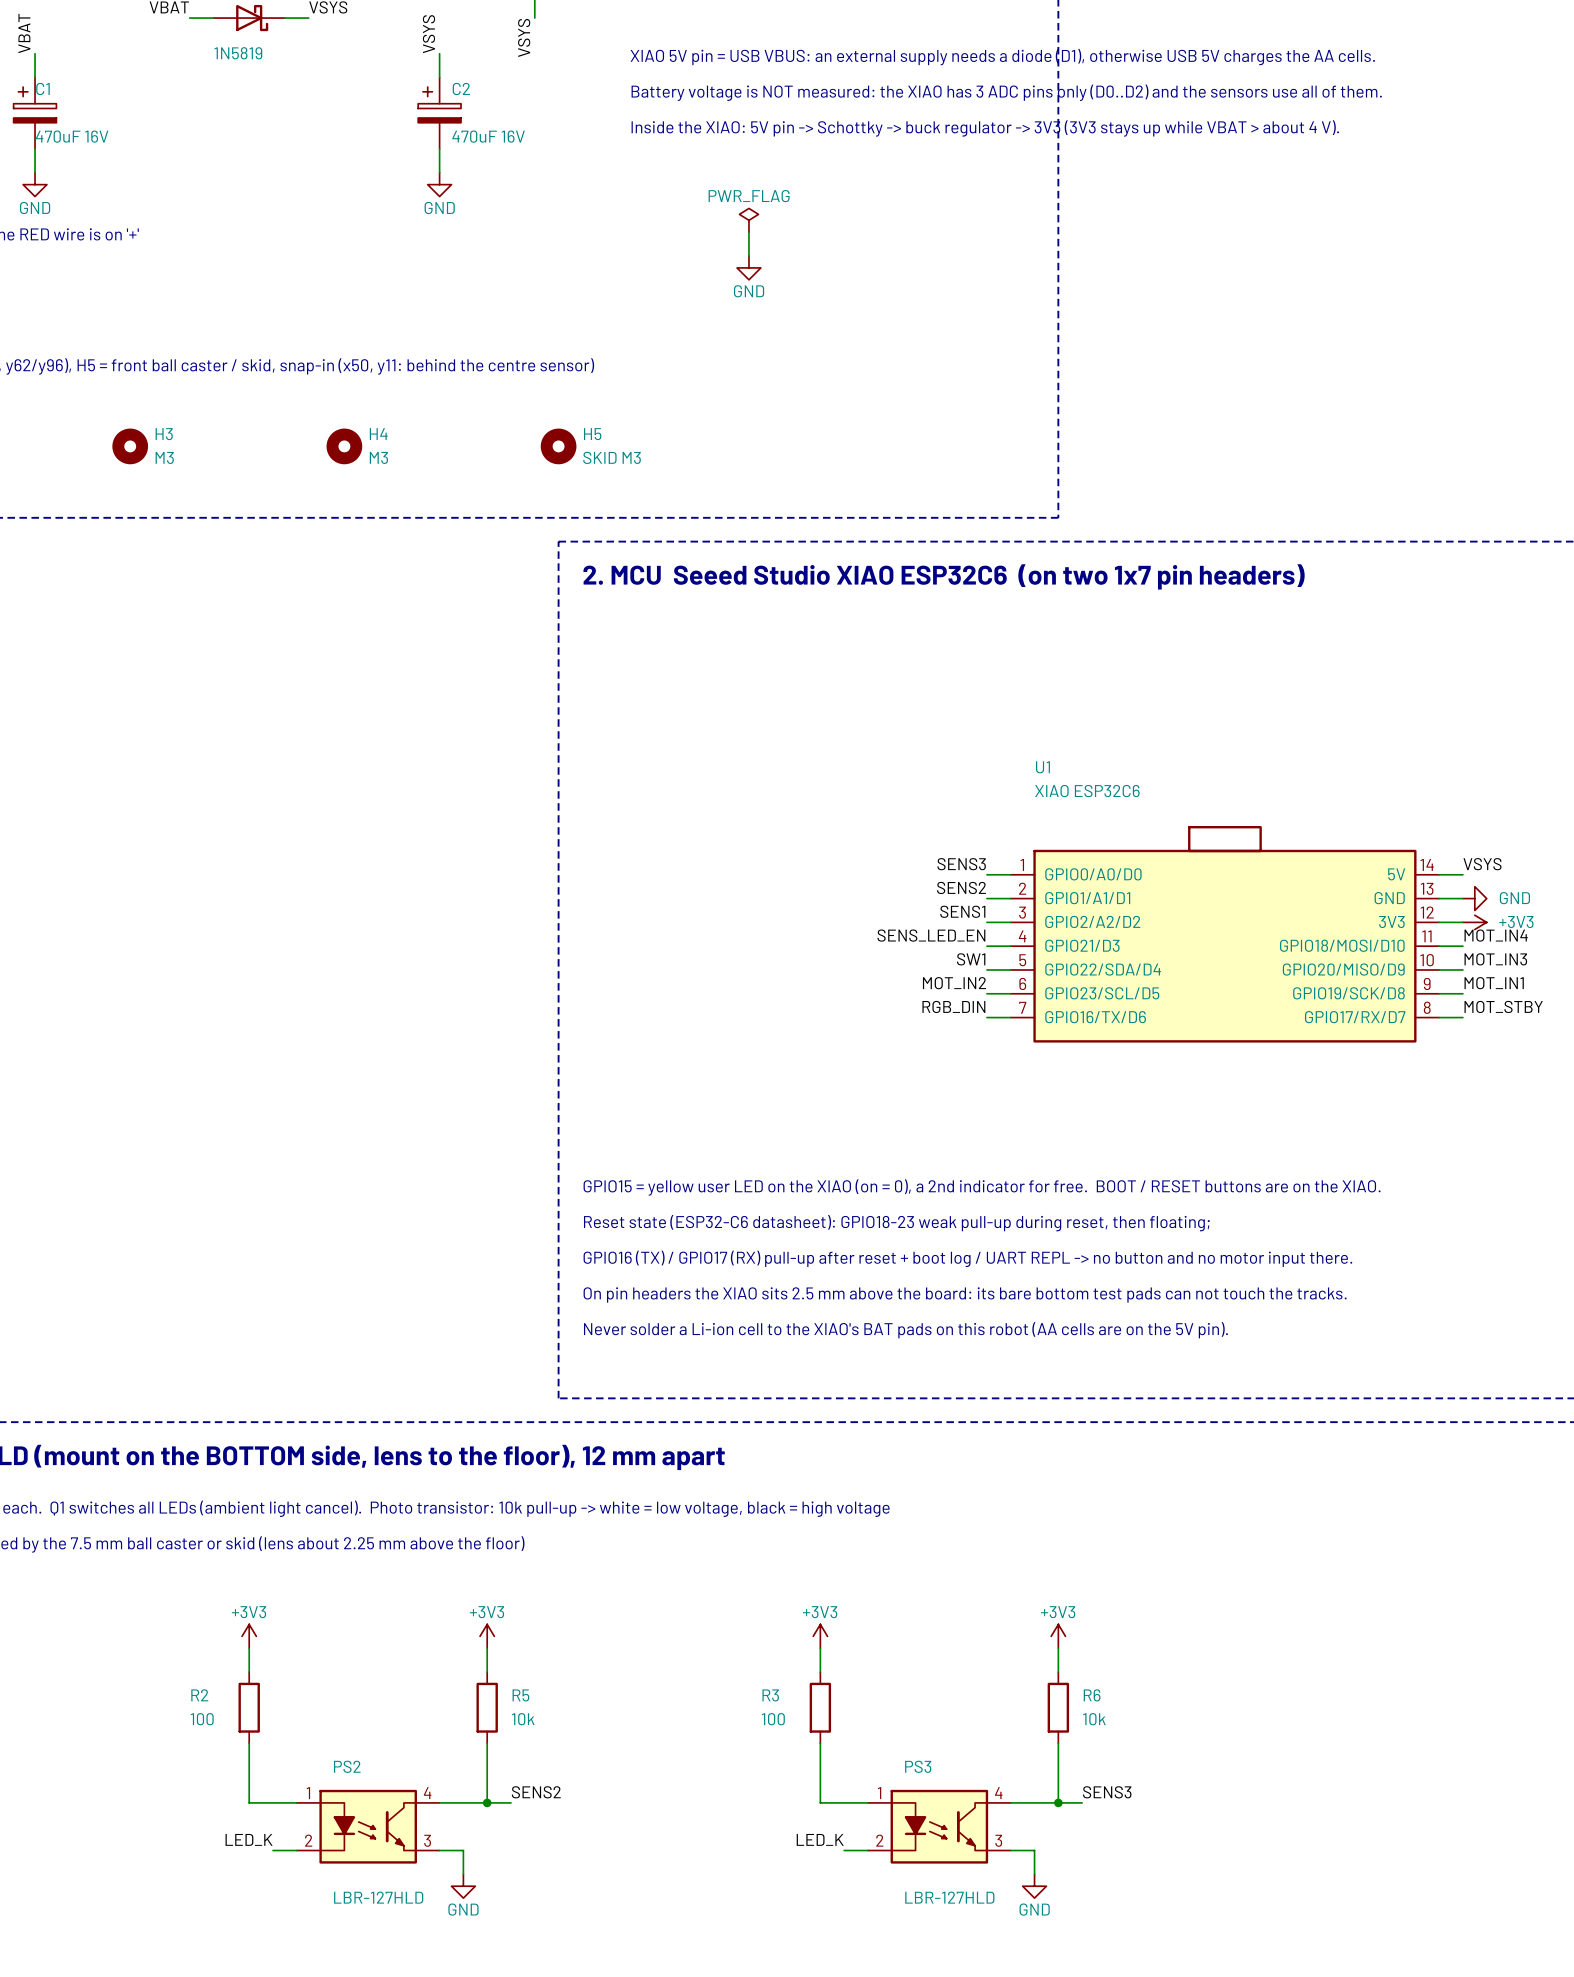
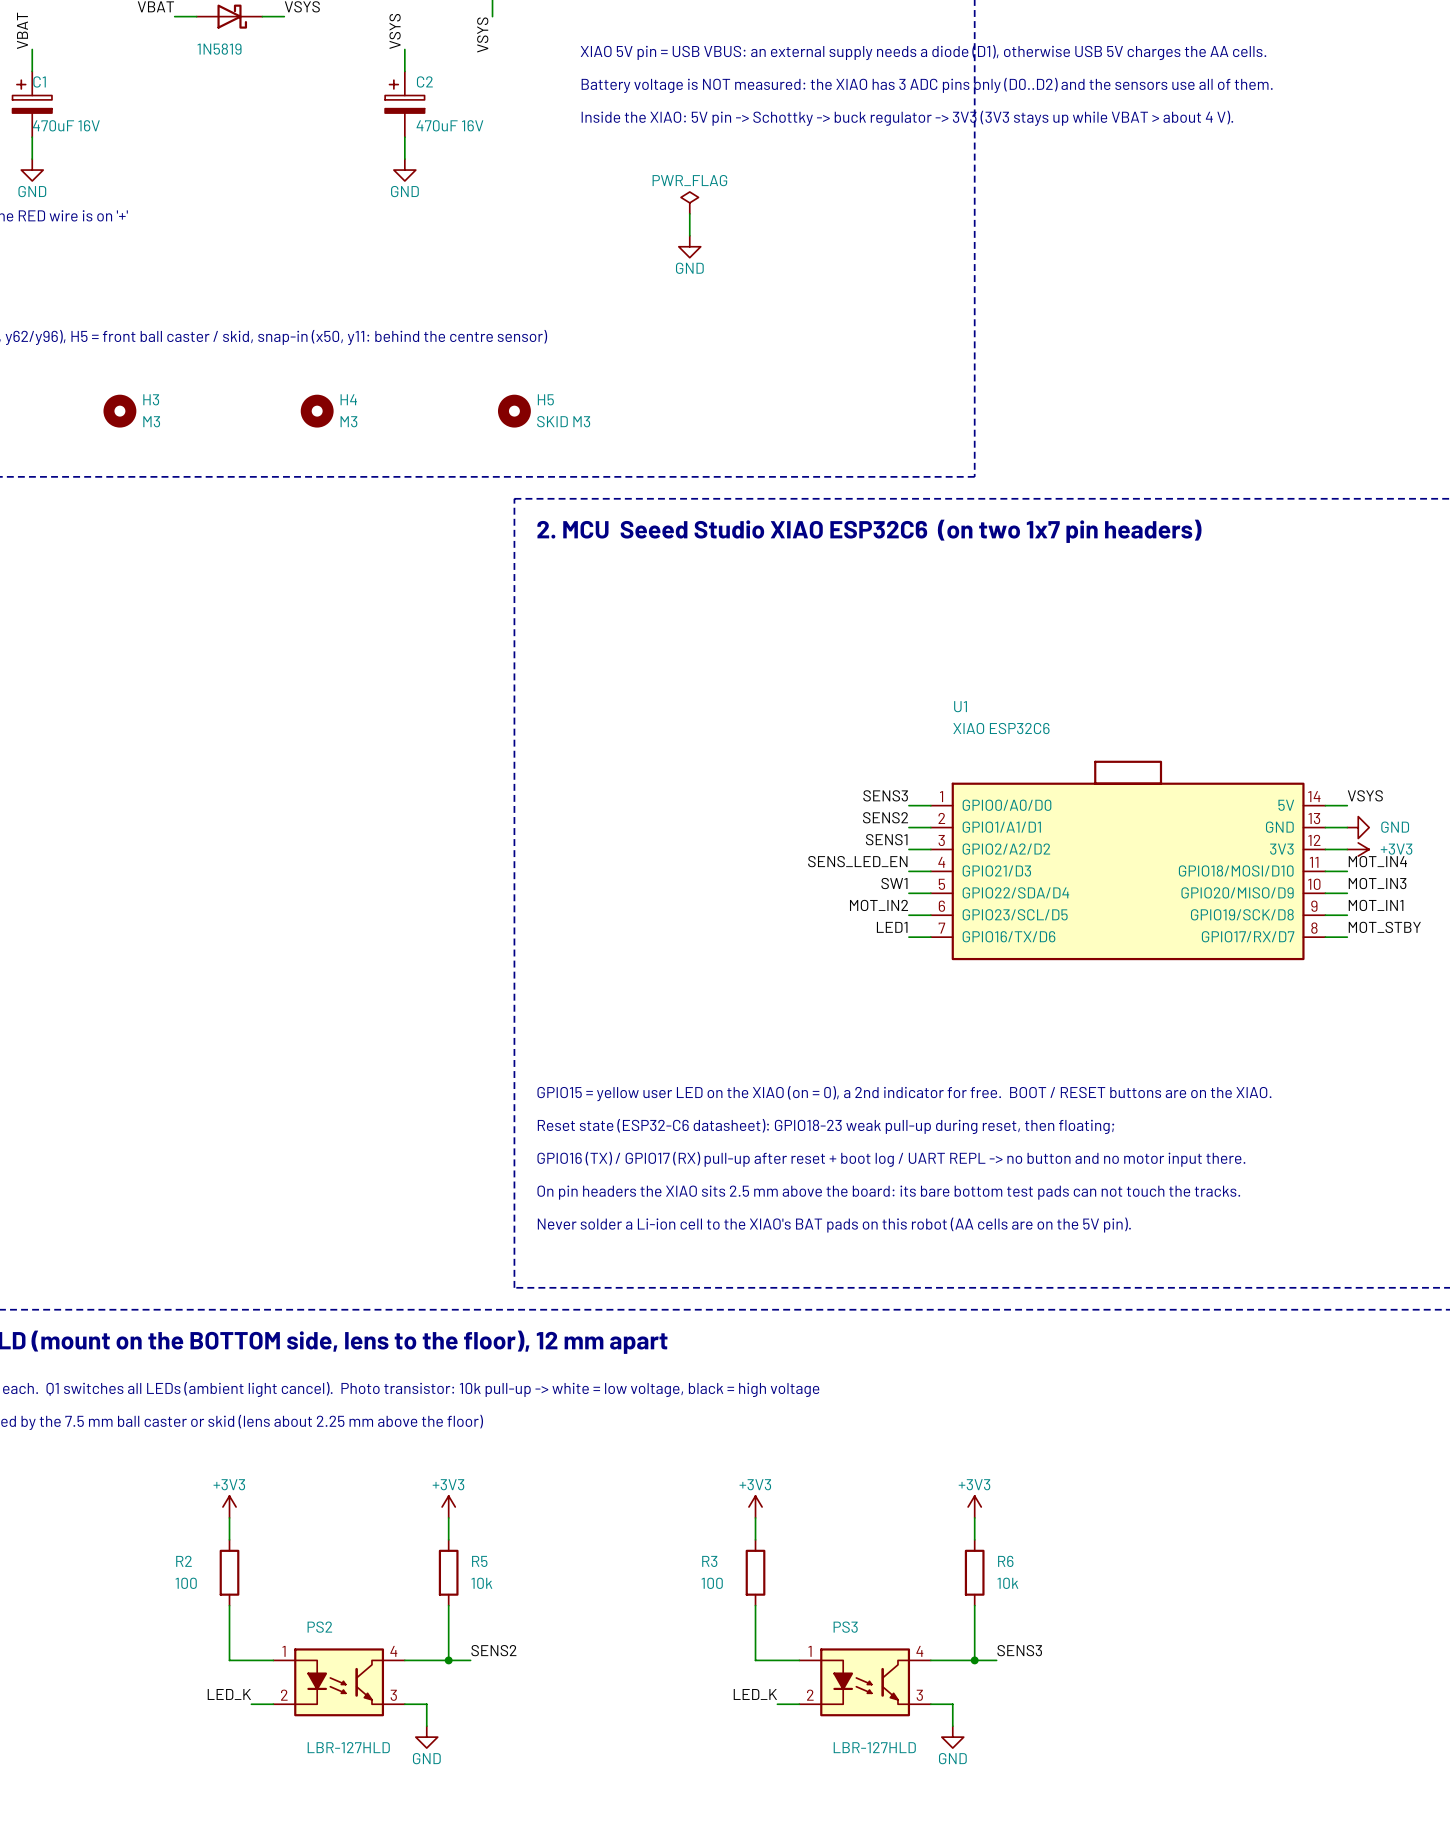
label: RGB_DIN (953, 1006) -> LED1 (892, 927)

